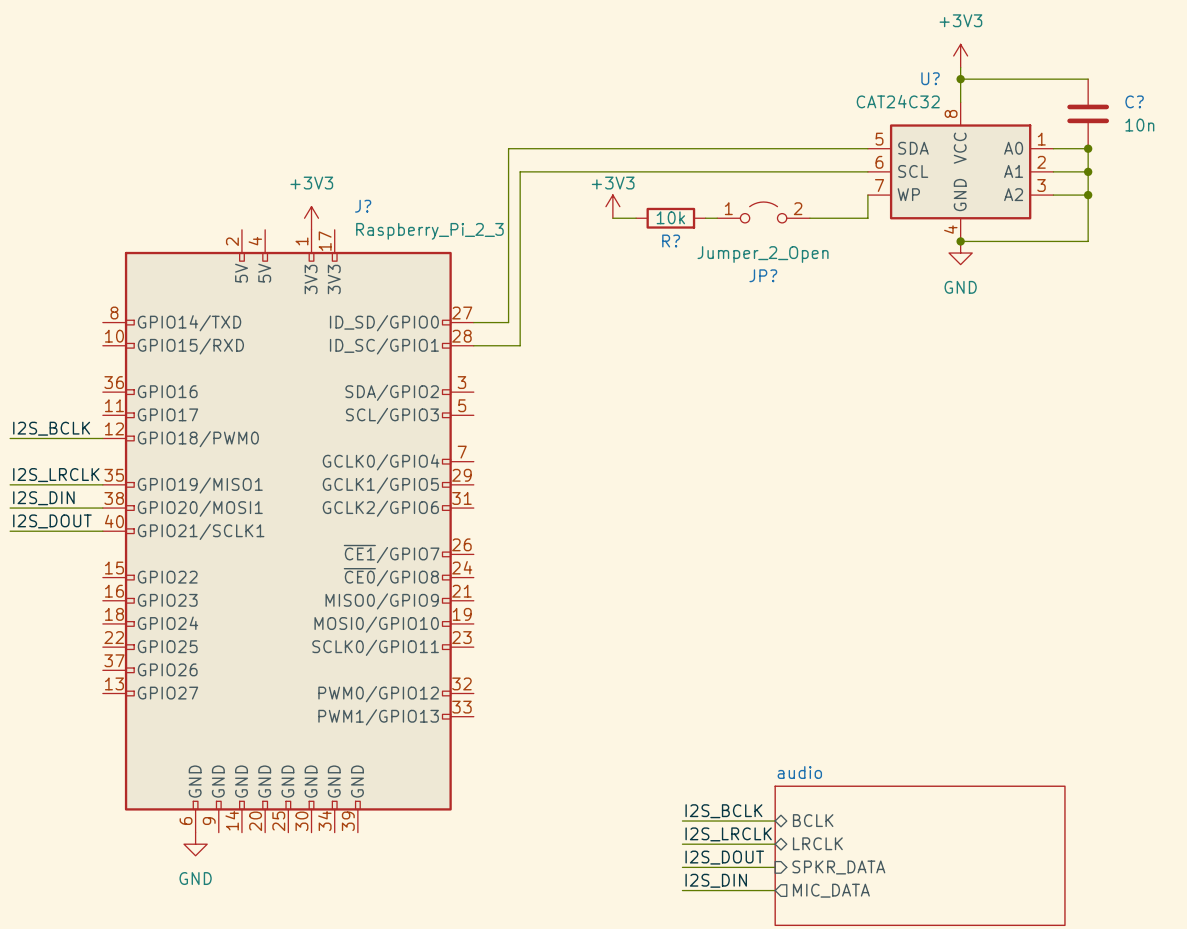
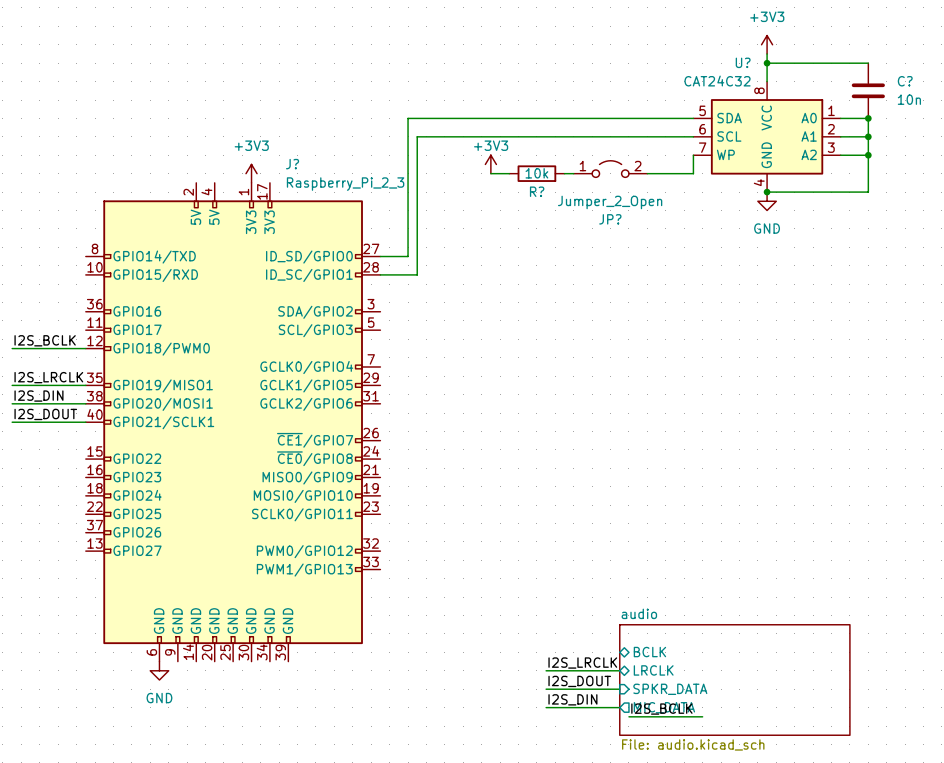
label position: I2S_BCLK (723, 811) -> I2S_BCLK (661, 709)
wire: (682, 821) (775, 821) -> (628, 716) (702, 716)

